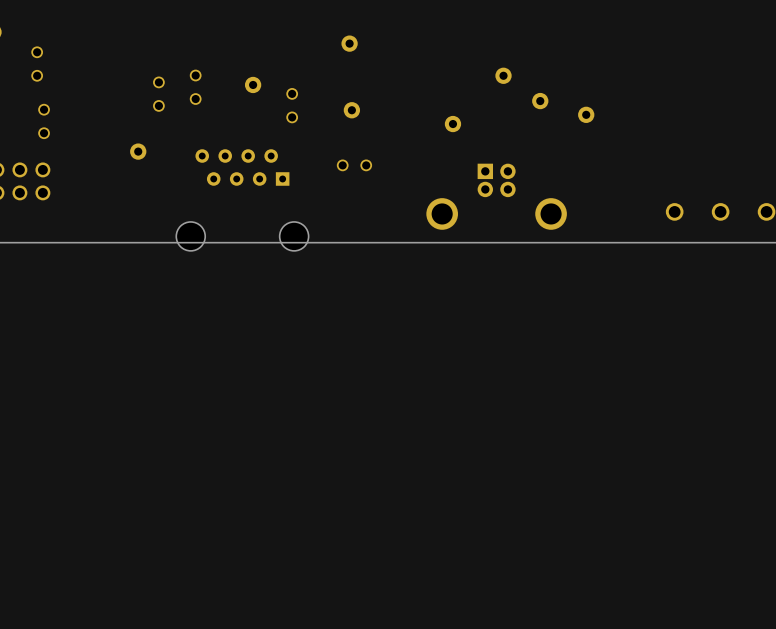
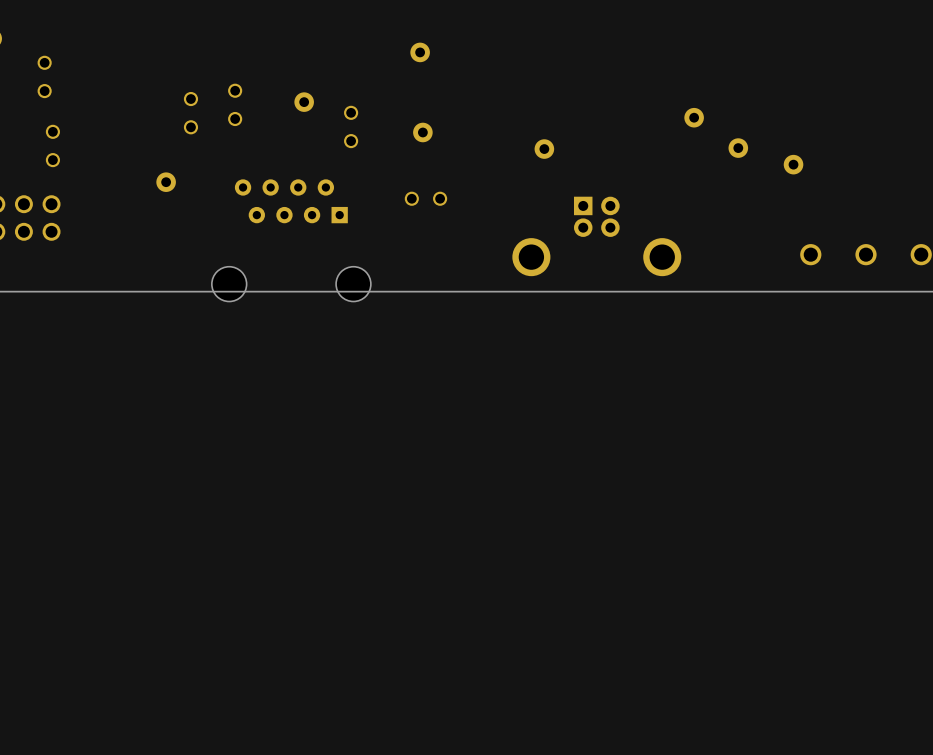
part: (503, 75) -> none
part: none -> (694, 117)
part: (540, 101) -> none
part: (586, 114) -> none
part: none -> (738, 148)
part: none -> (793, 164)

